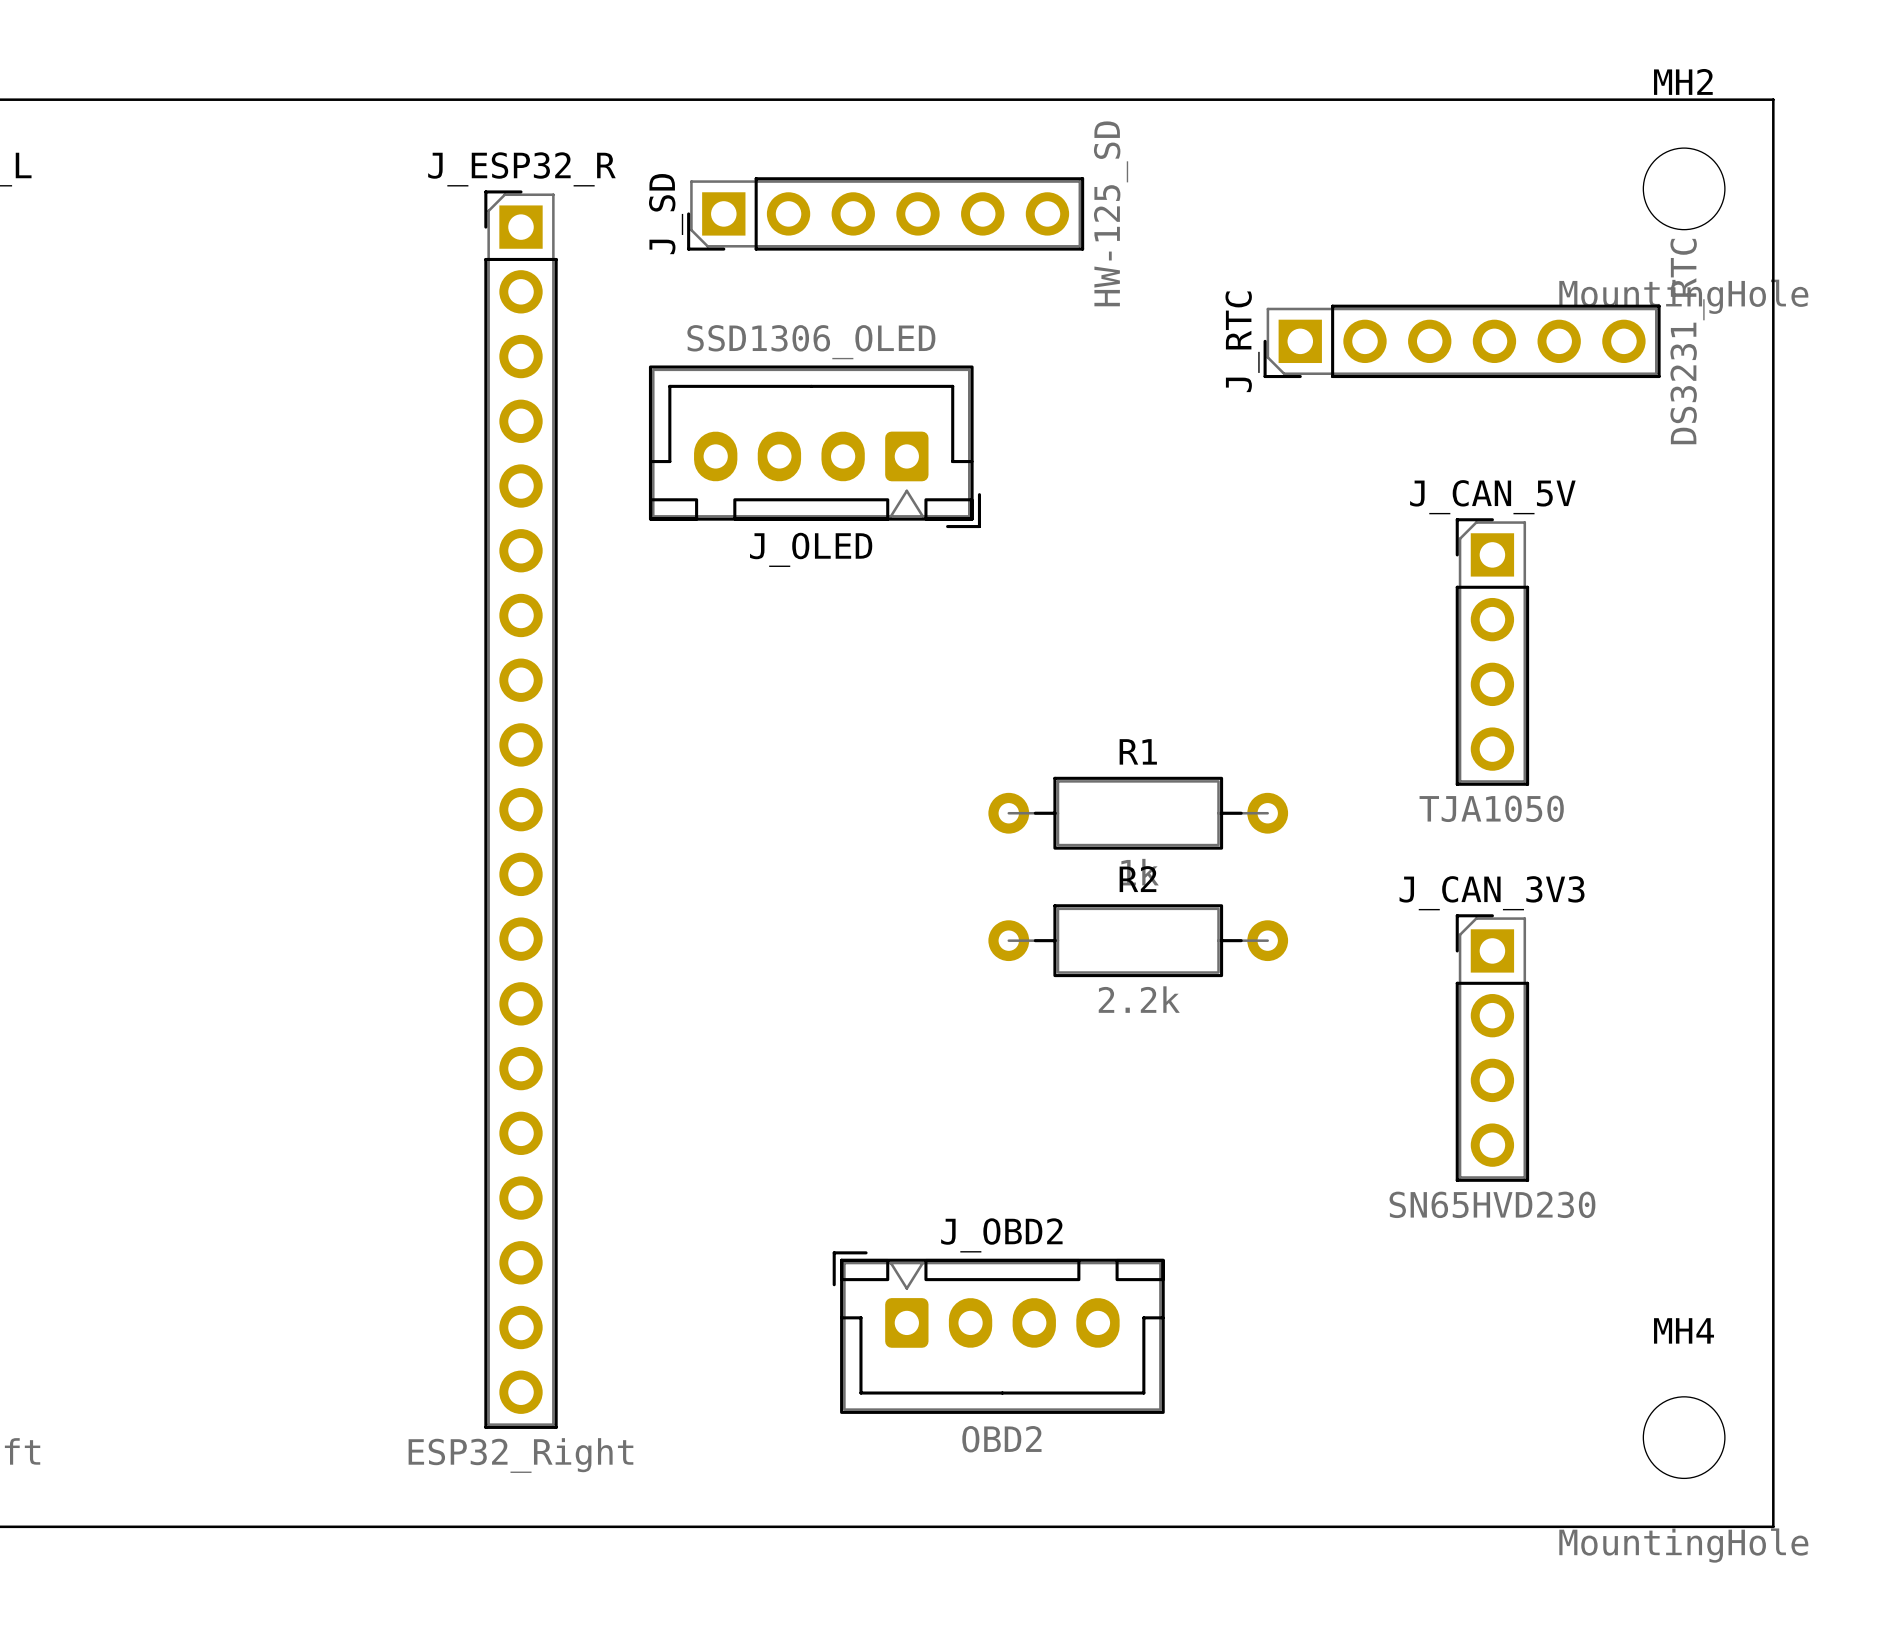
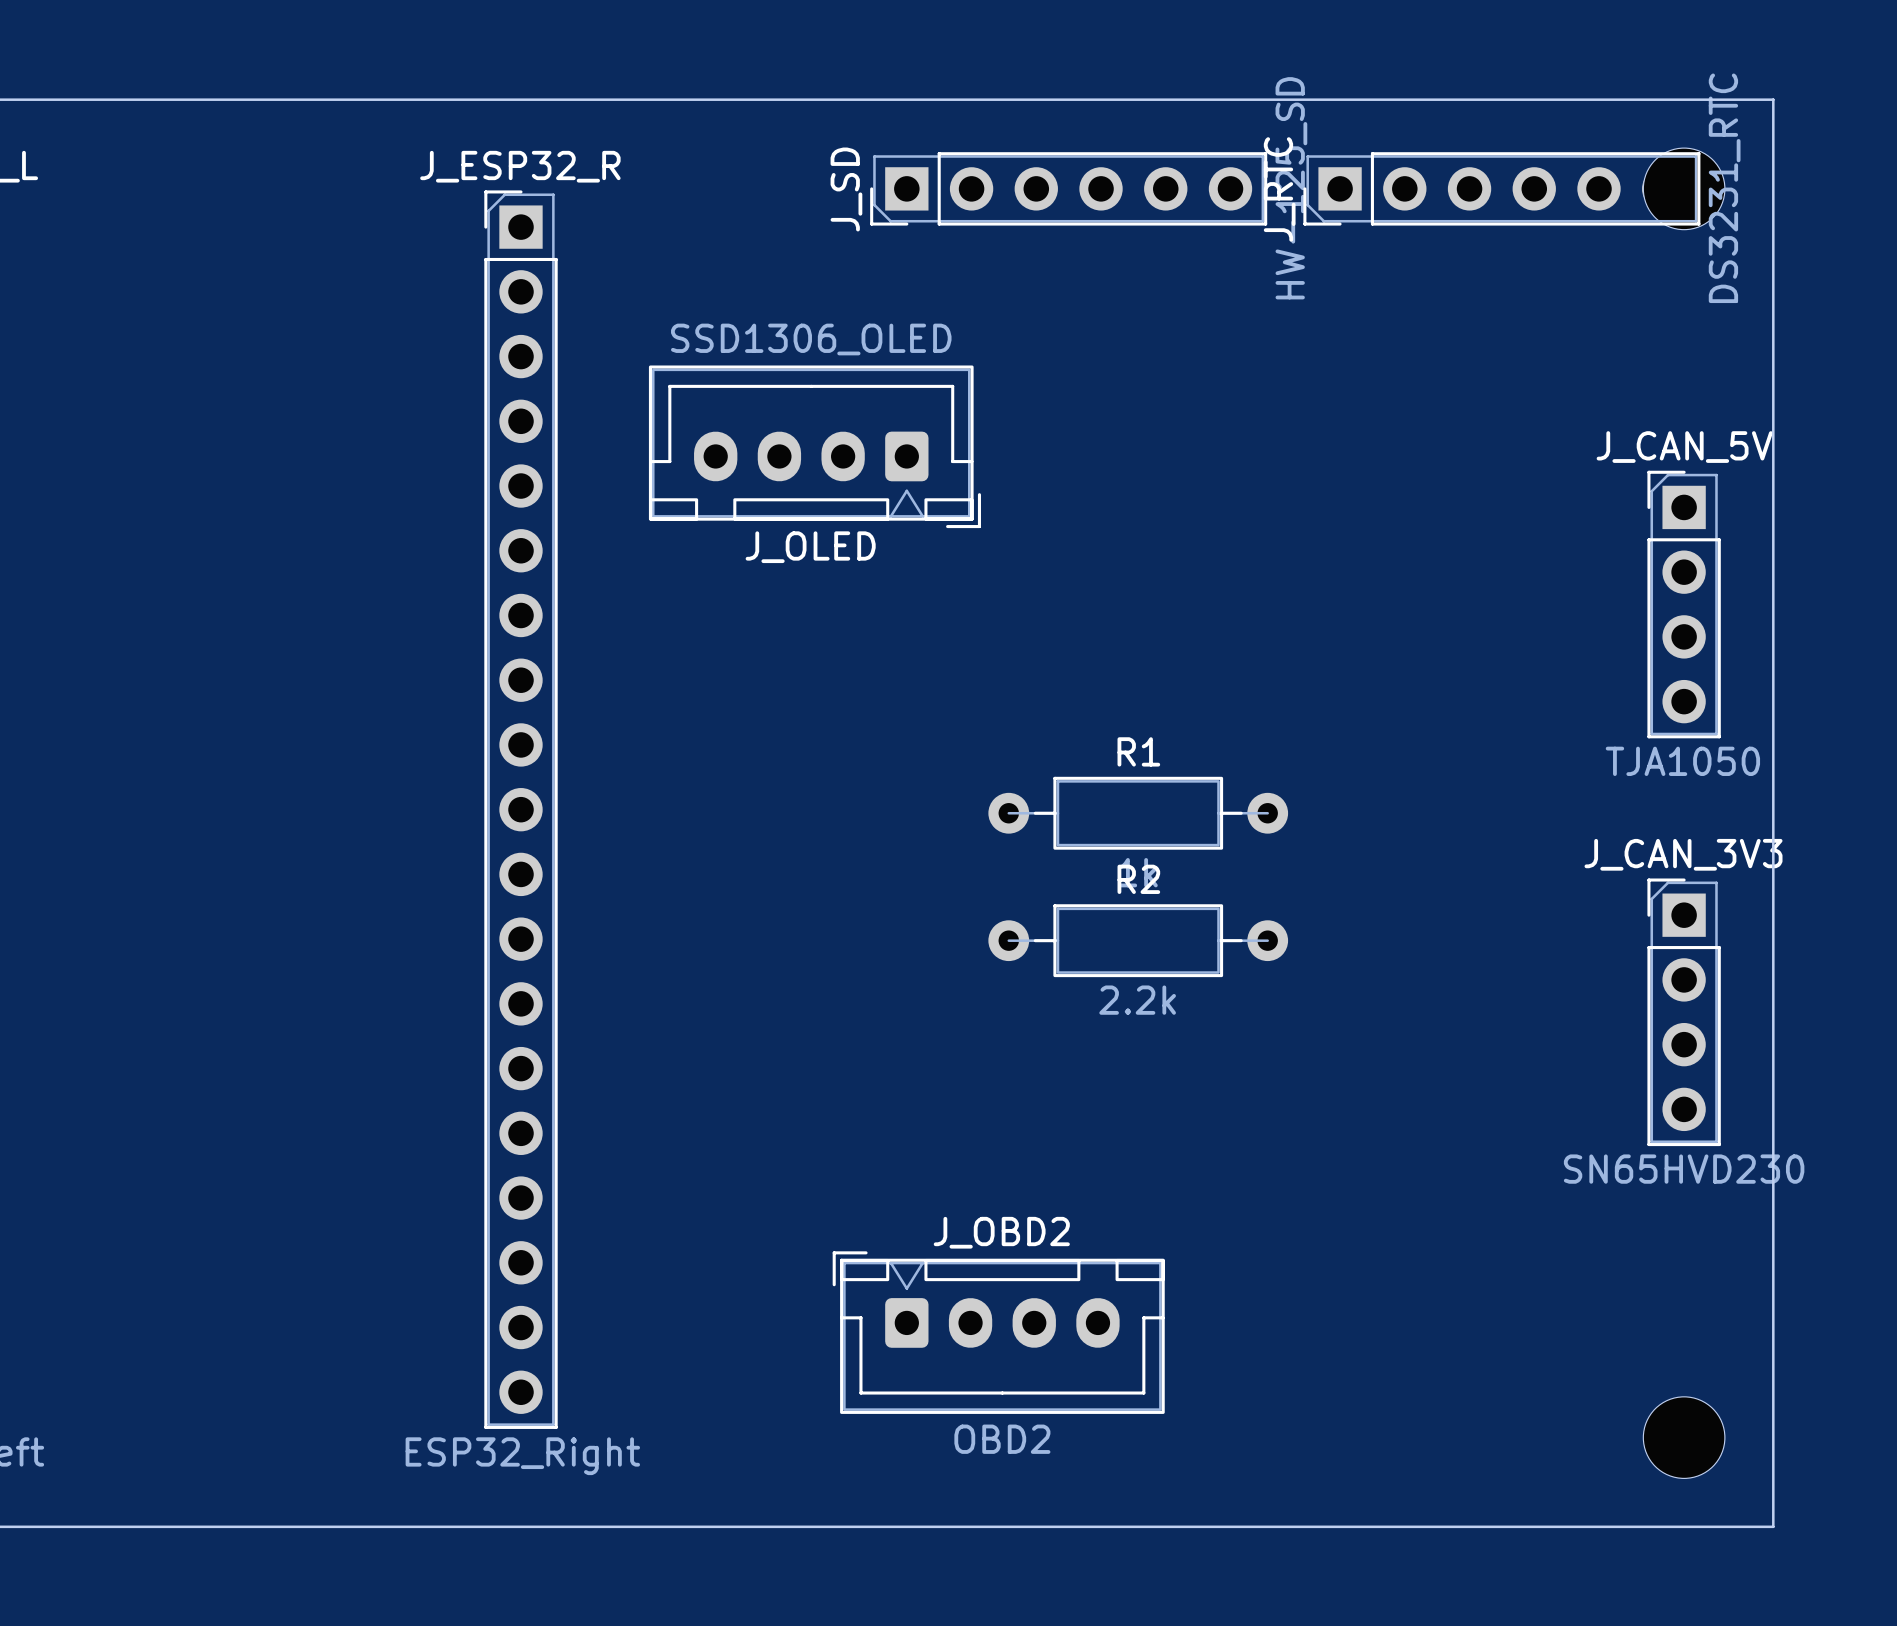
MH2 name: MH2 (1683, 81) -> none
J_SD position: (885, 213) -> (1068, 188)
MH2 value: MountingHole (1683, 296) -> none
J_RTC position: (1462, 341) -> (1501, 188)
J_CAN_5V position: (1492, 652) -> (1684, 604)
J_CAN_3V3 position: (1492, 1048) -> (1684, 1012)
MH4 name: MH4 (1684, 1330) -> none
MH4 value: MountingHole (1683, 1545) -> none

